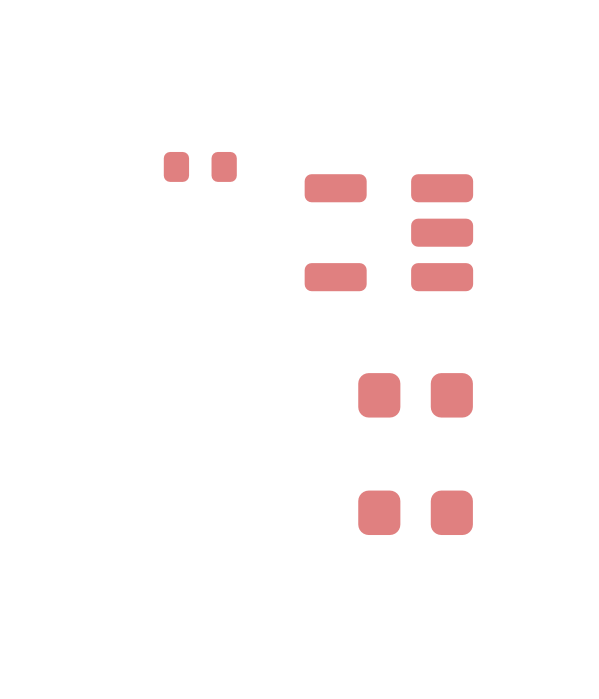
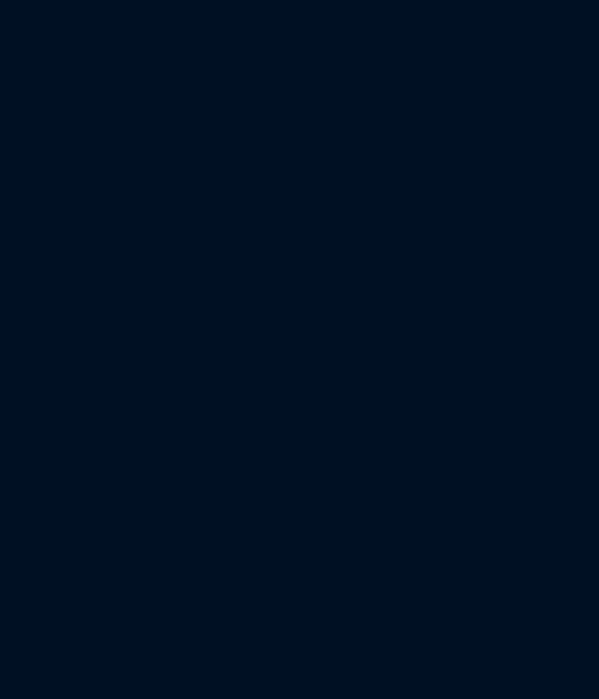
part: (200, 166) -> none
part: (388, 232) -> none
part: (415, 395) -> none
part: (415, 512) -> none

